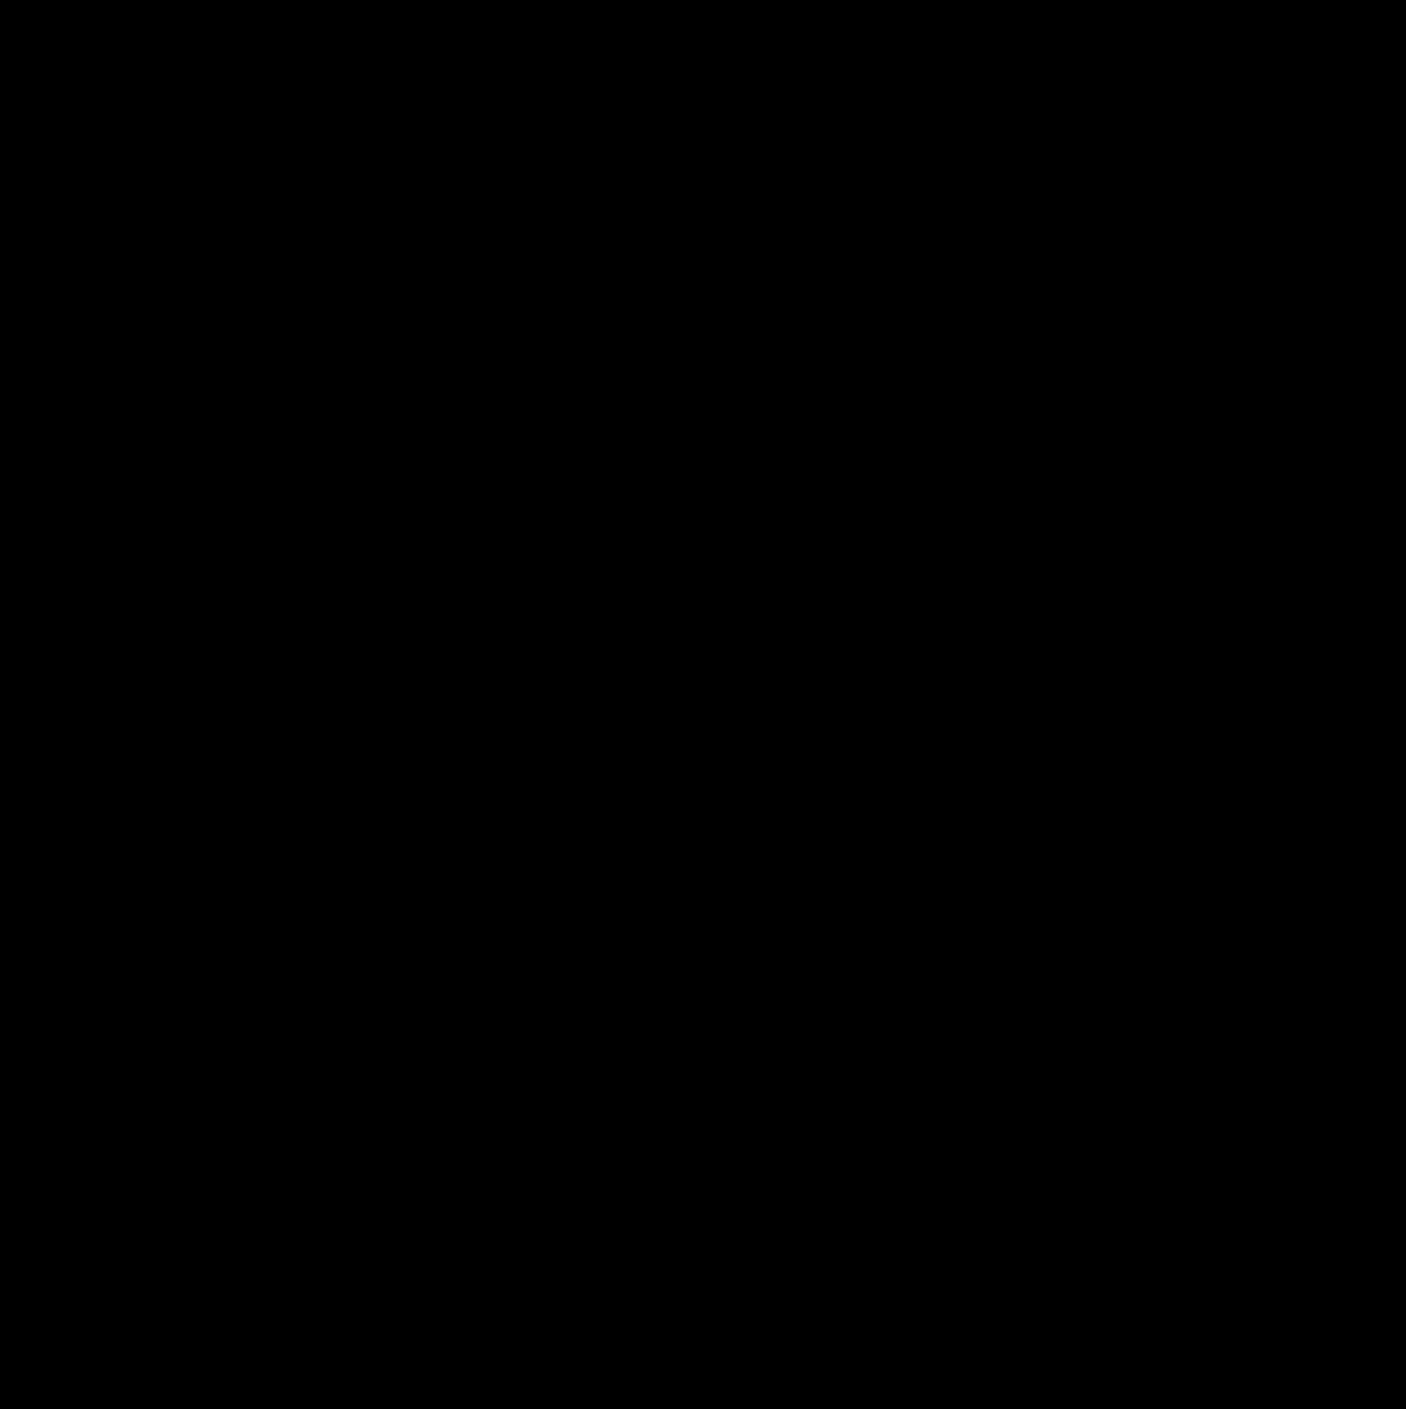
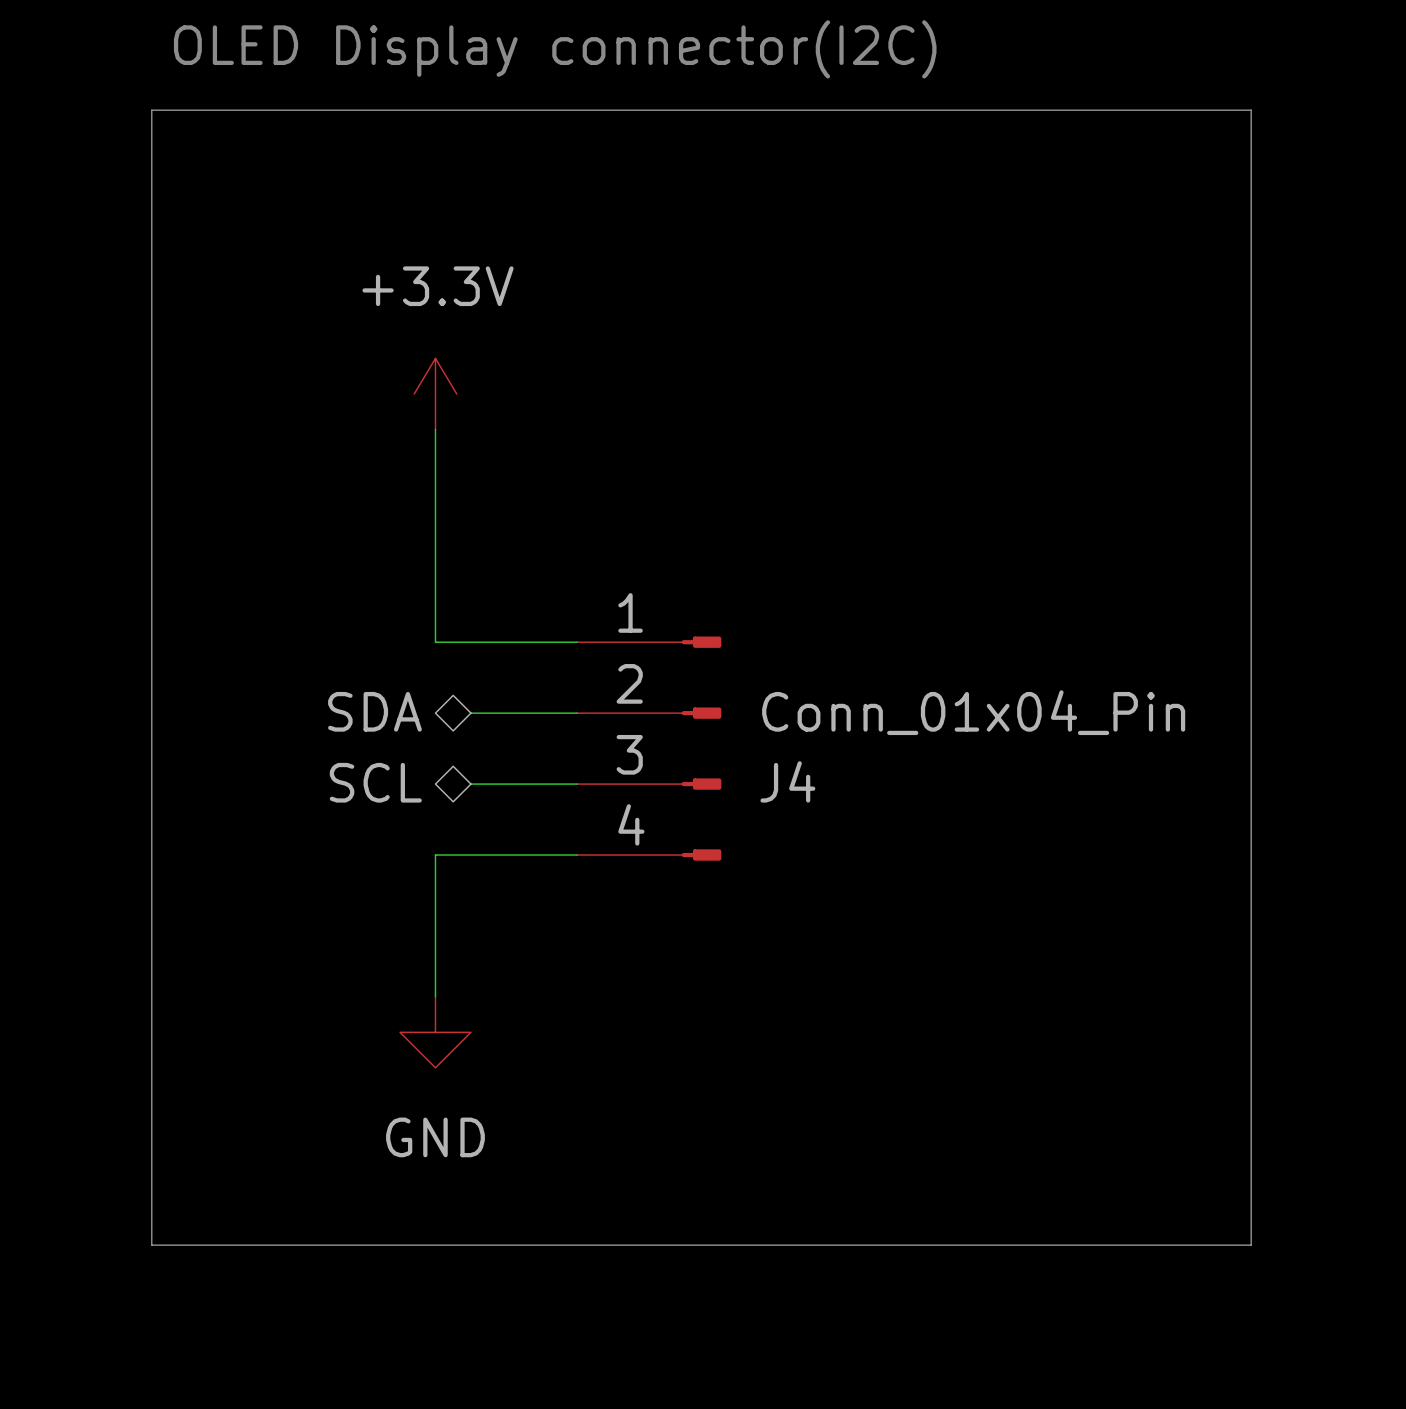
text: none -> OLED Display connector(I2C) (555, 49)
line: none -> (151, 110) (1251, 110) (1251, 1245) (151, 1245) (151, 110)
power symbol: none -> +3.3V (435, 393)
wire: none -> (435, 429) (435, 642) (577, 642)
hierarchical label: none -> SDA (374, 711)
wire: none -> (470, 713) (577, 713)
J4: none -> Conn_01x04_Pin (649, 748)
hierarchical label: none -> SCL (375, 782)
wire: none -> (470, 784) (577, 784)
wire: none -> (577, 855) (435, 855) (435, 996)
power symbol: none -> GND (435, 1032)

